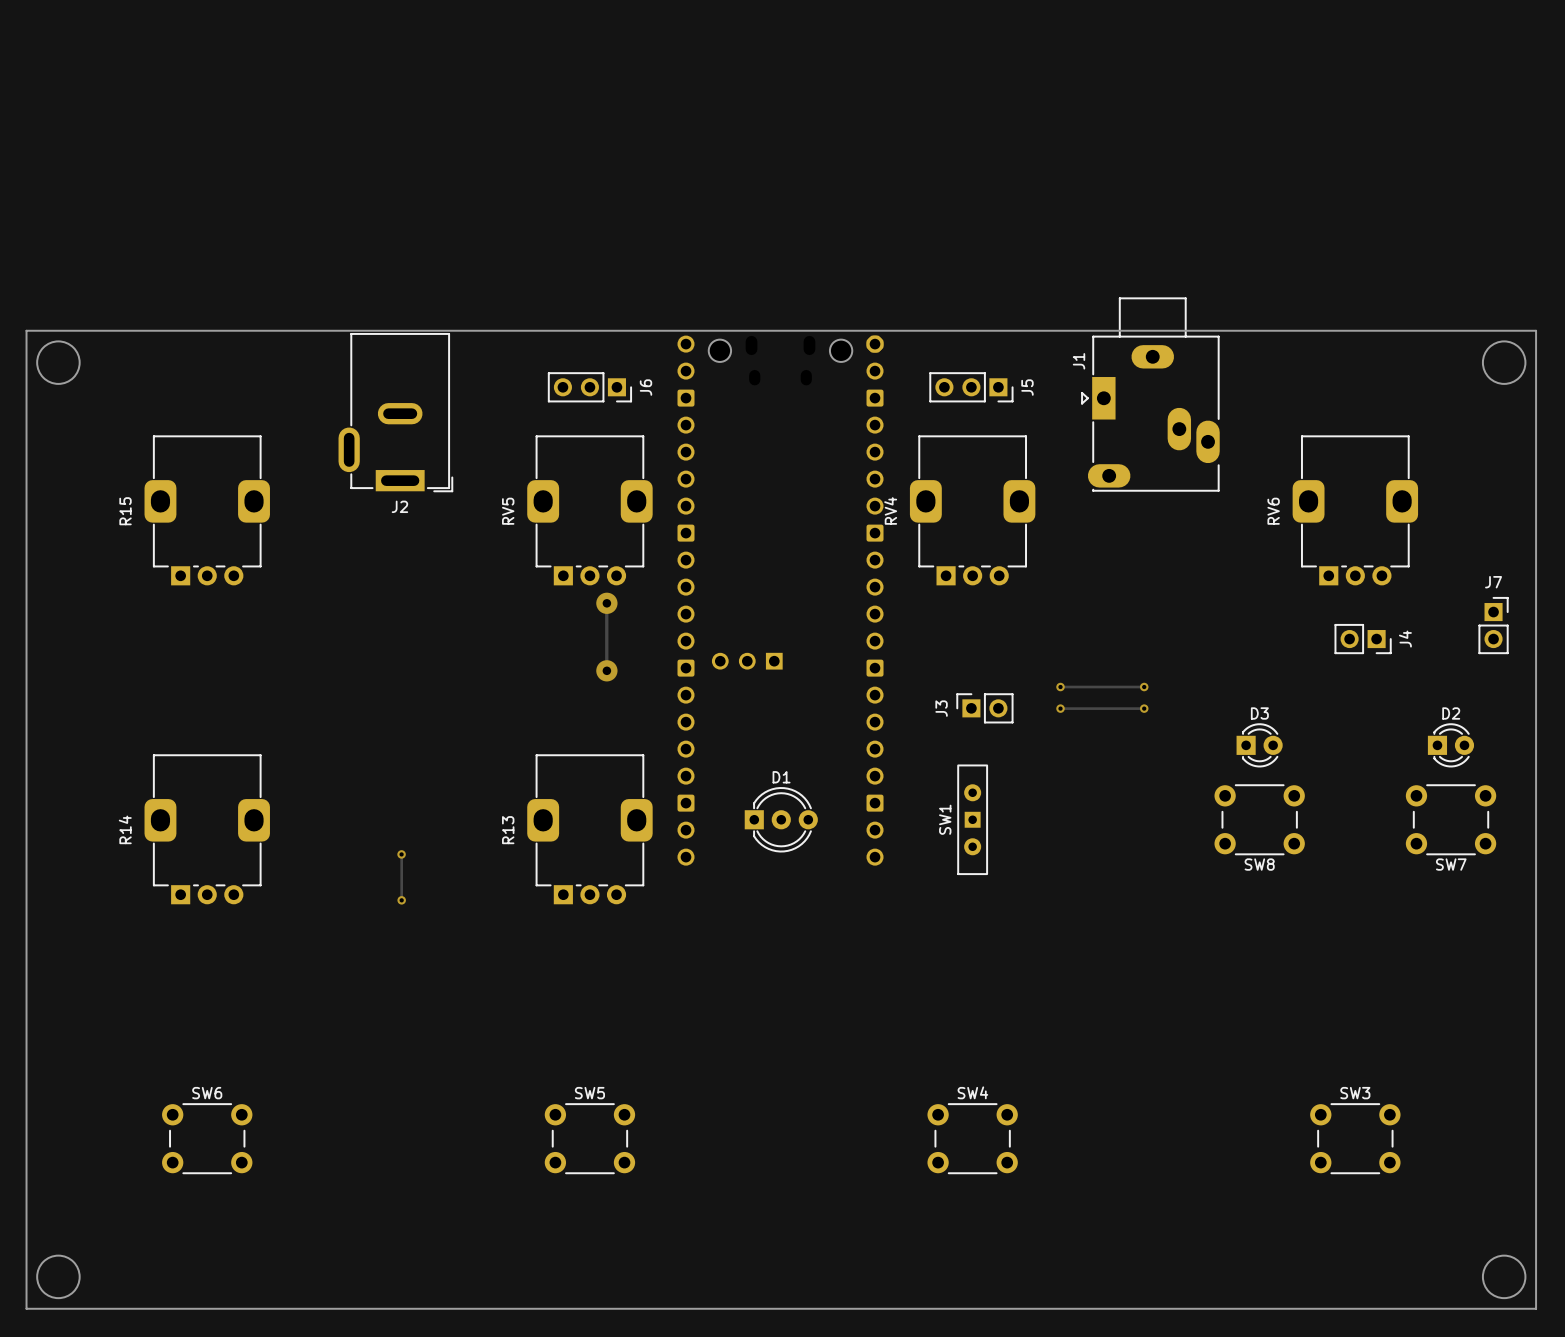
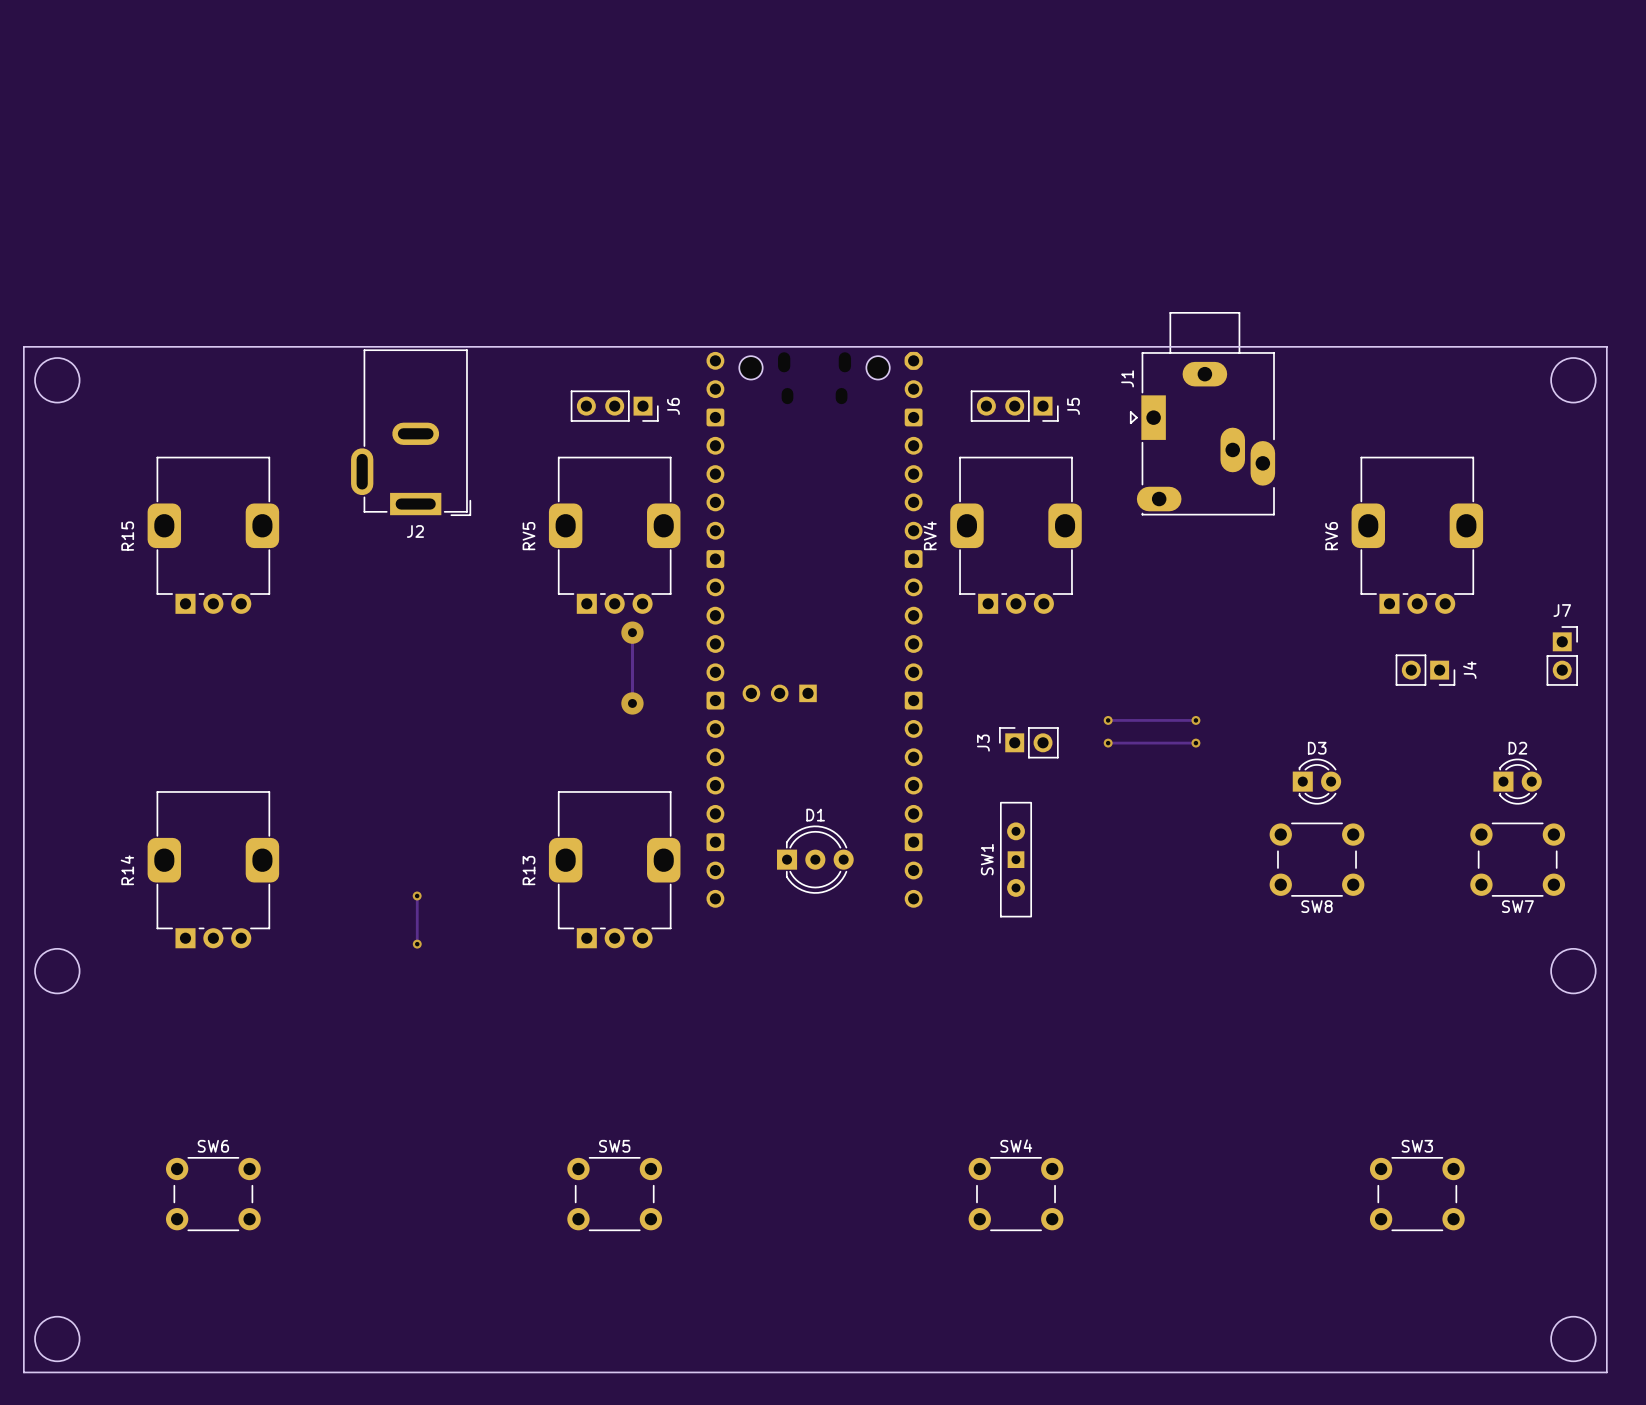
round board edge: none -> [34, 948, 81, 994]
round board edge: none -> [1550, 948, 1597, 994]

